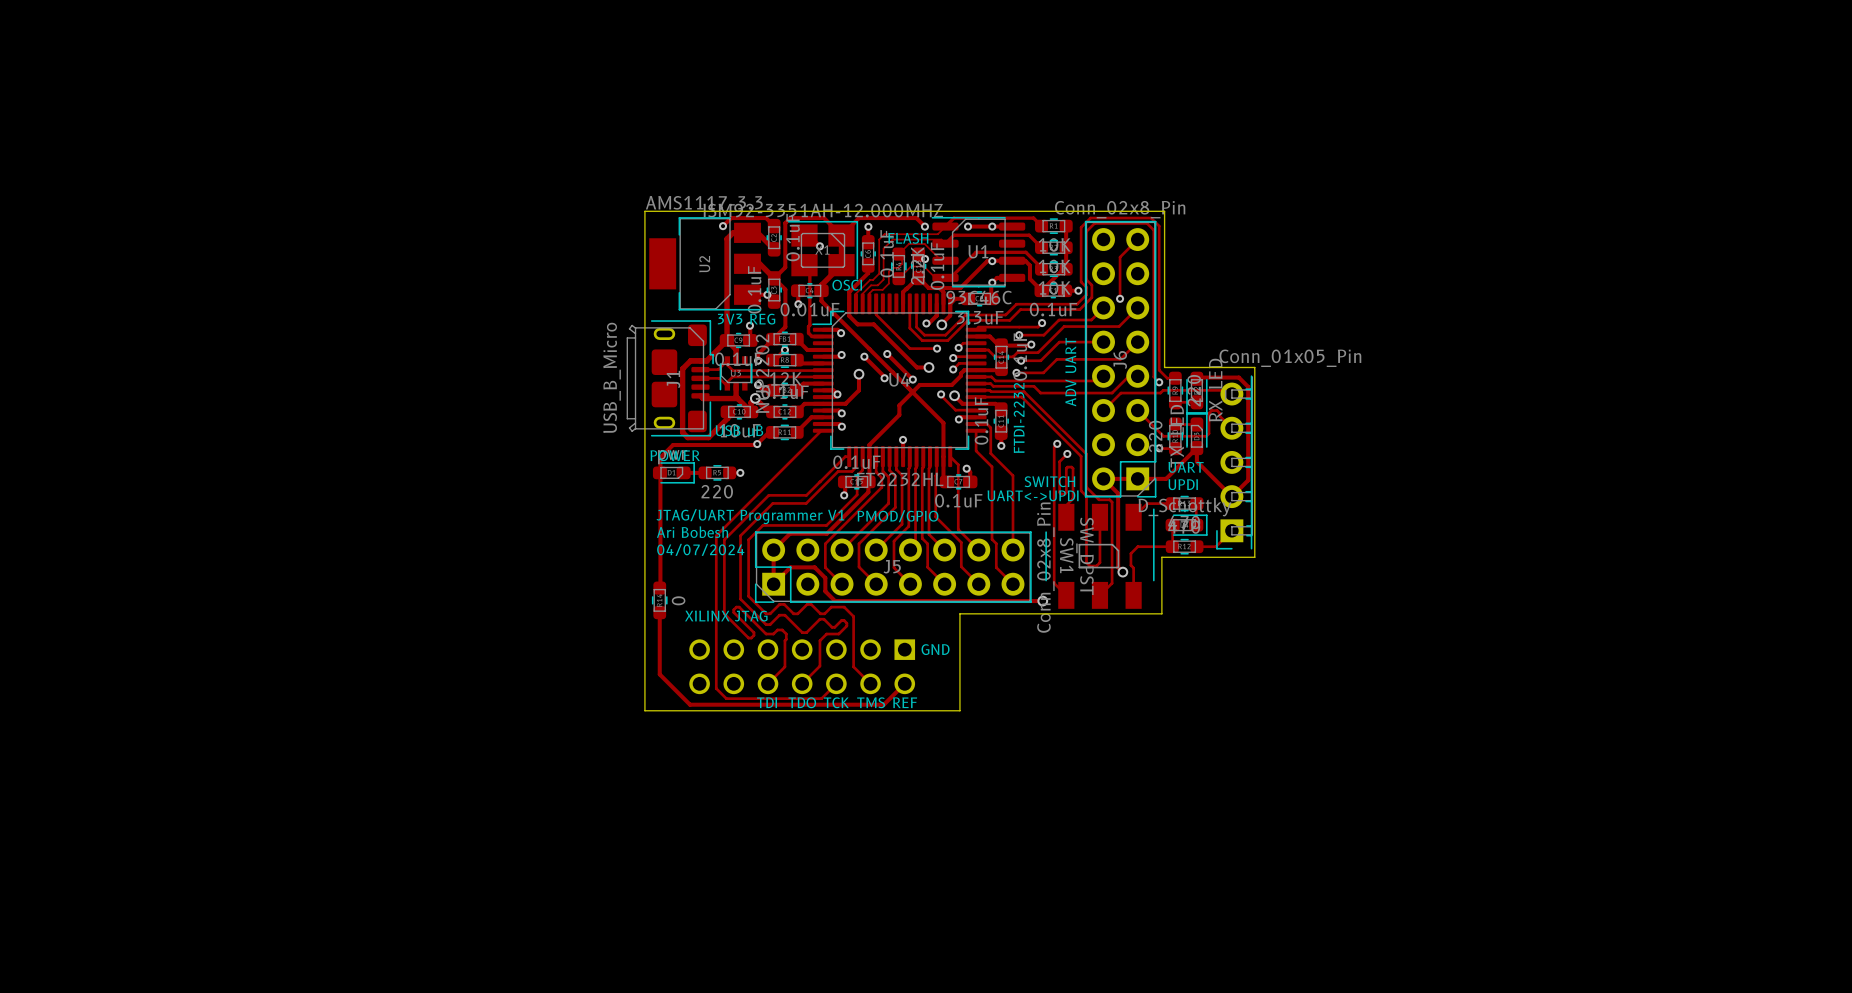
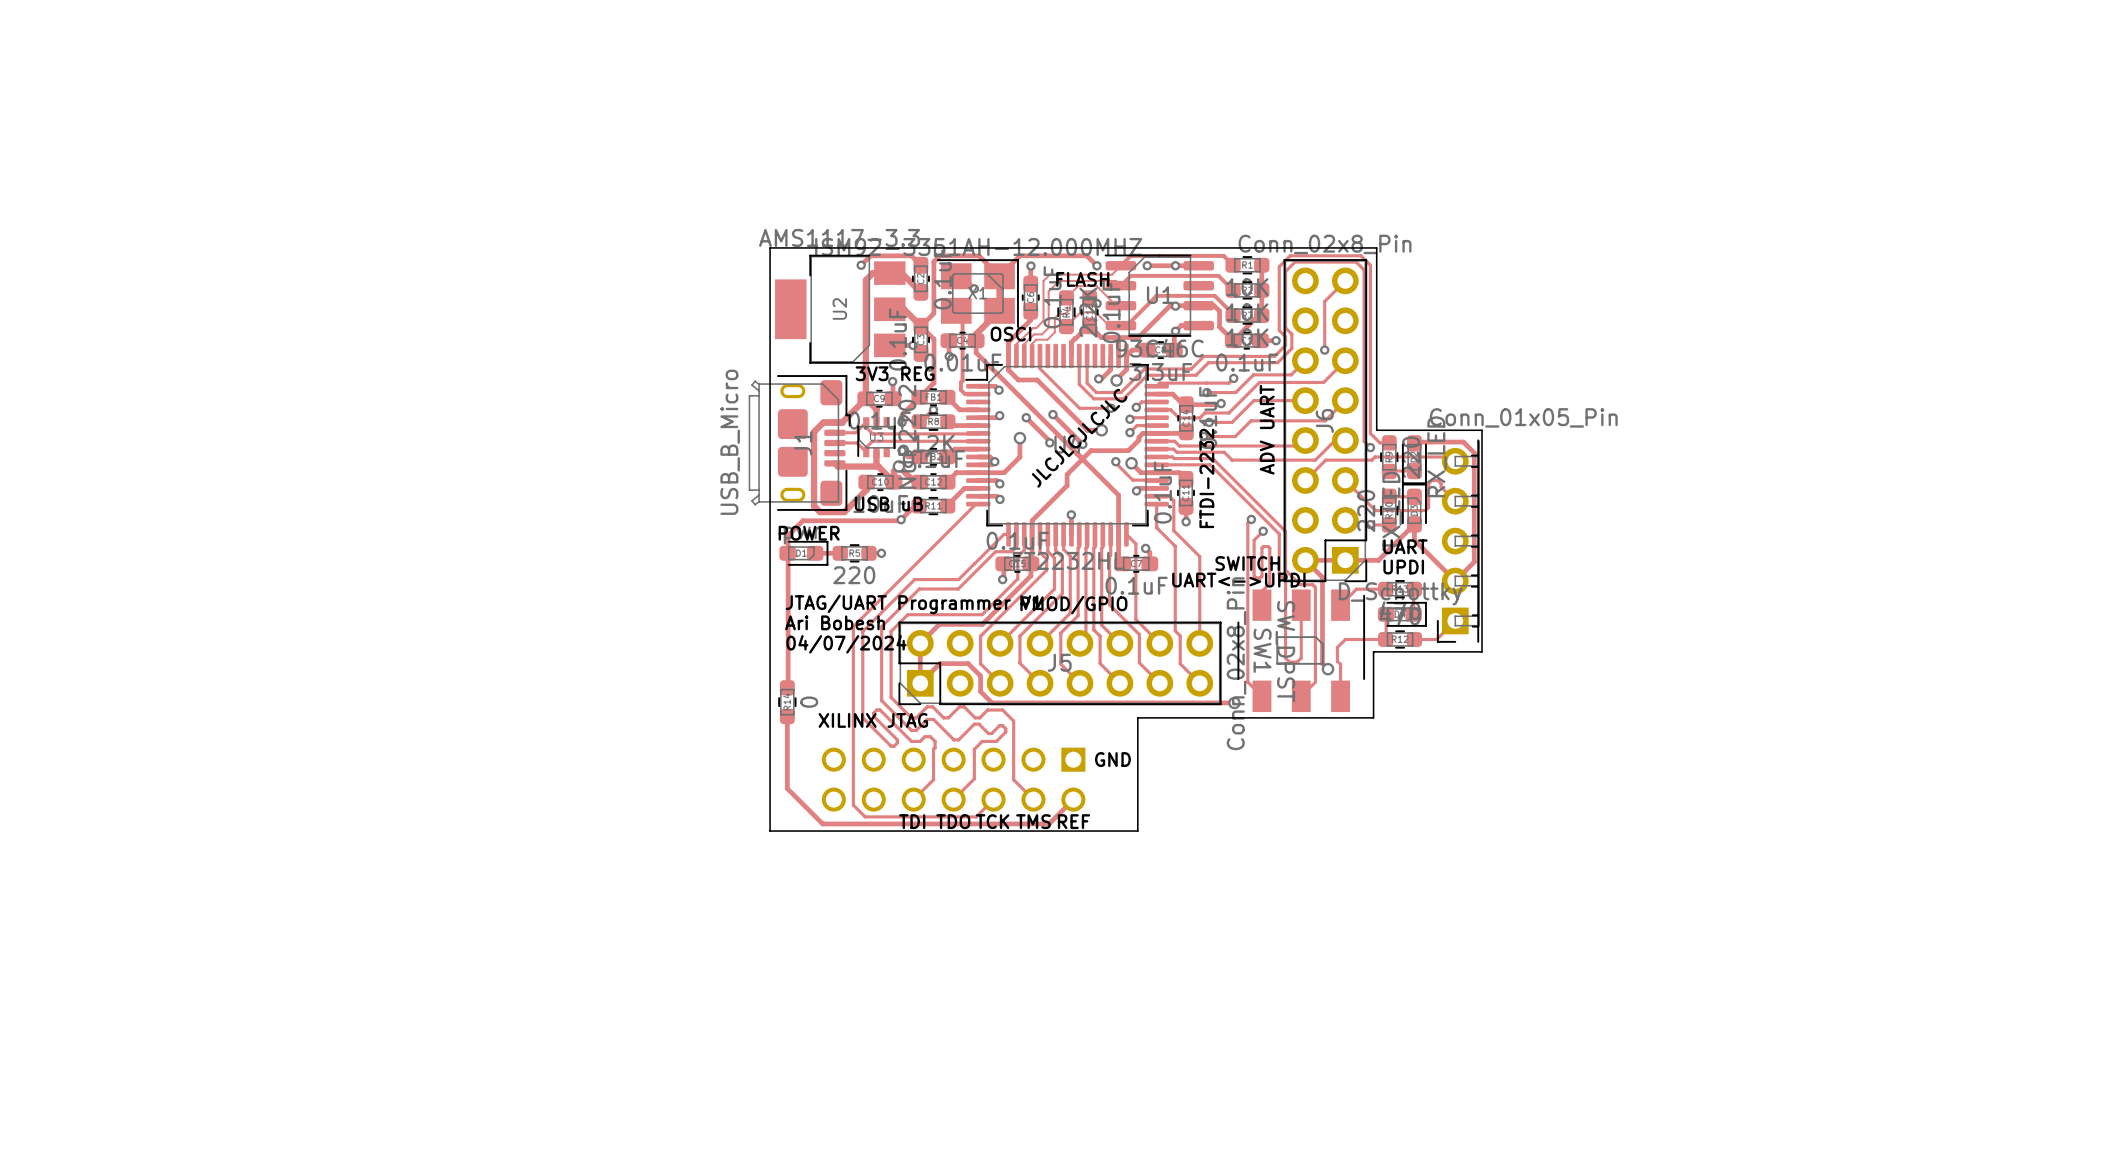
text: none -> JLCJLCJLCJLC (1079, 438)

